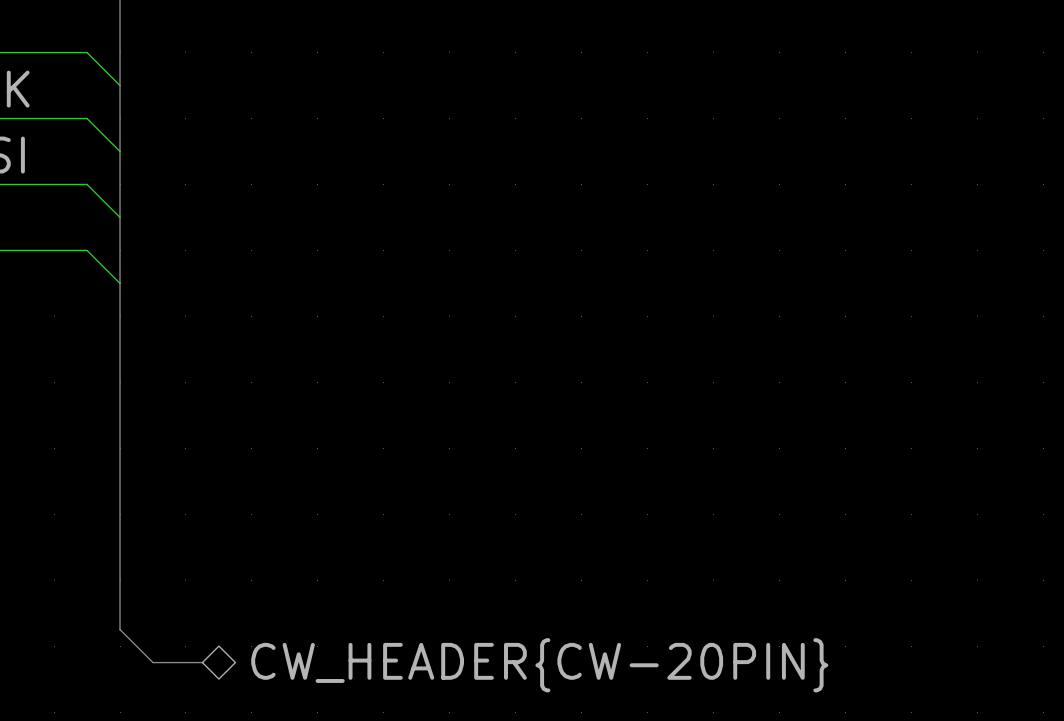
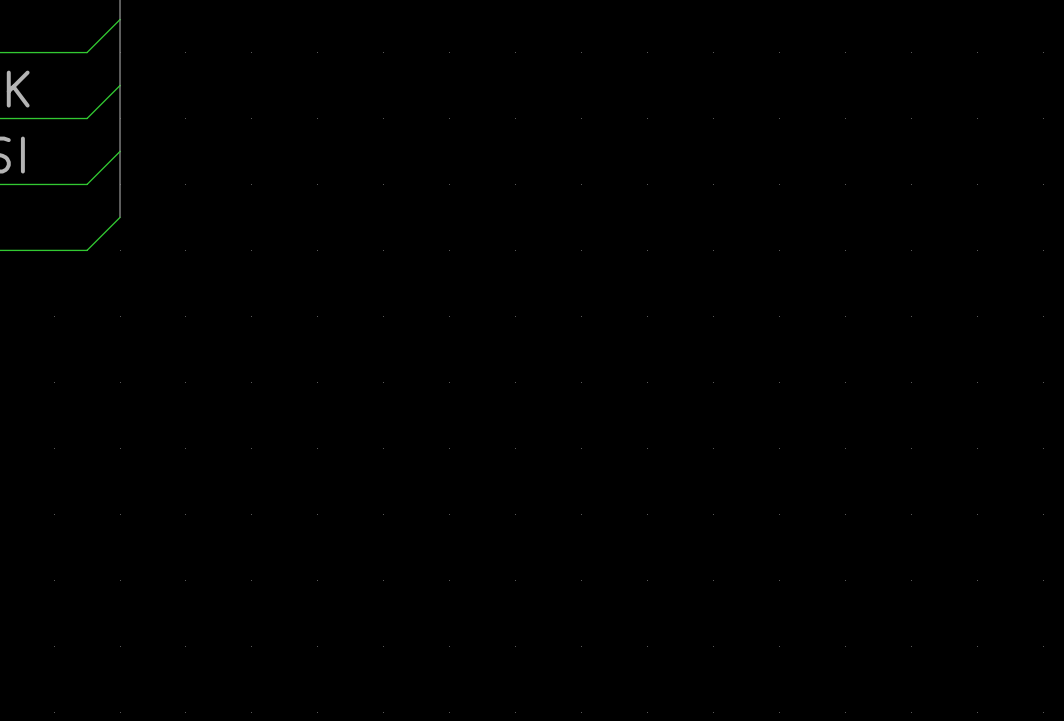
wire: (87, 52) (120, 85) -> (87, 52) (120, 19)
wire: (87, 118) (120, 151) -> (87, 118) (120, 85)
wire: none -> (120, 151) (87, 184)
wire: (87, 184) (120, 217) -> (87, 250) (120, 217)
bus: (120, 217) (120, 629) (152, 662) (202, 662) -> none
wire: (87, 250) (120, 283) -> none
hierarchical label: CW_HEADER{CW-20PIN} (539, 665) -> none

